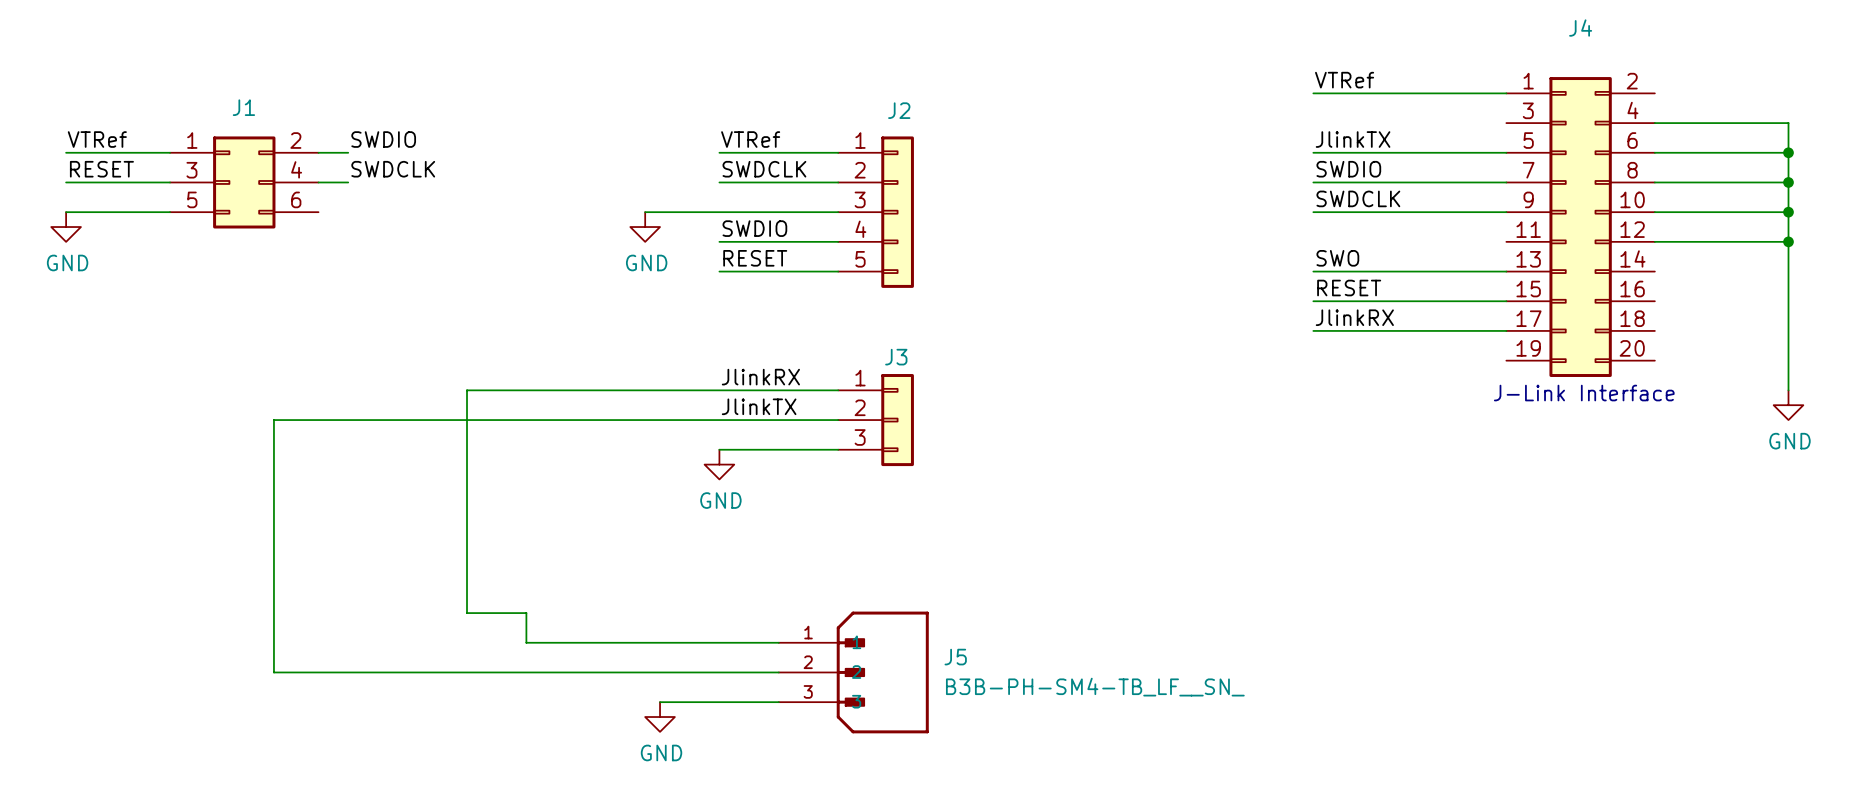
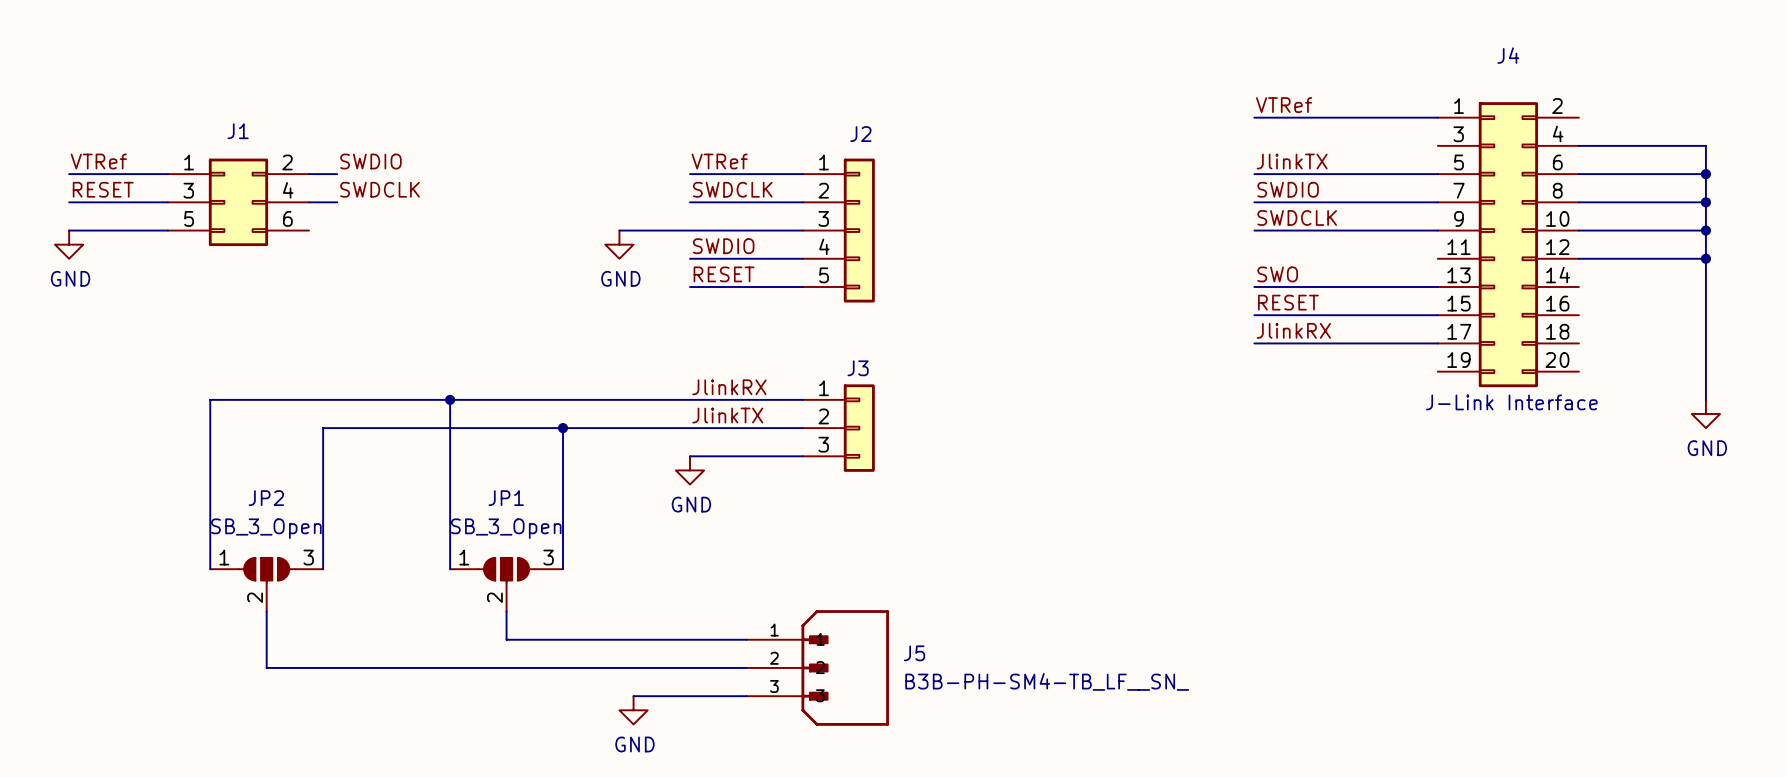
wire: none -> (450, 399) (210, 399) (210, 569)
junction: none -> (450, 399)
wire: (333, 420) (273, 420) (273, 613) -> (323, 428) (323, 569)
wire: none -> (563, 428) (563, 569)
junction: none -> (563, 428)
wire: (467, 568) (467, 613) (526, 613) -> none
JP2: none -> SB_3_Open (266, 584)
JP1: none -> SB_3_Open (506, 584)

